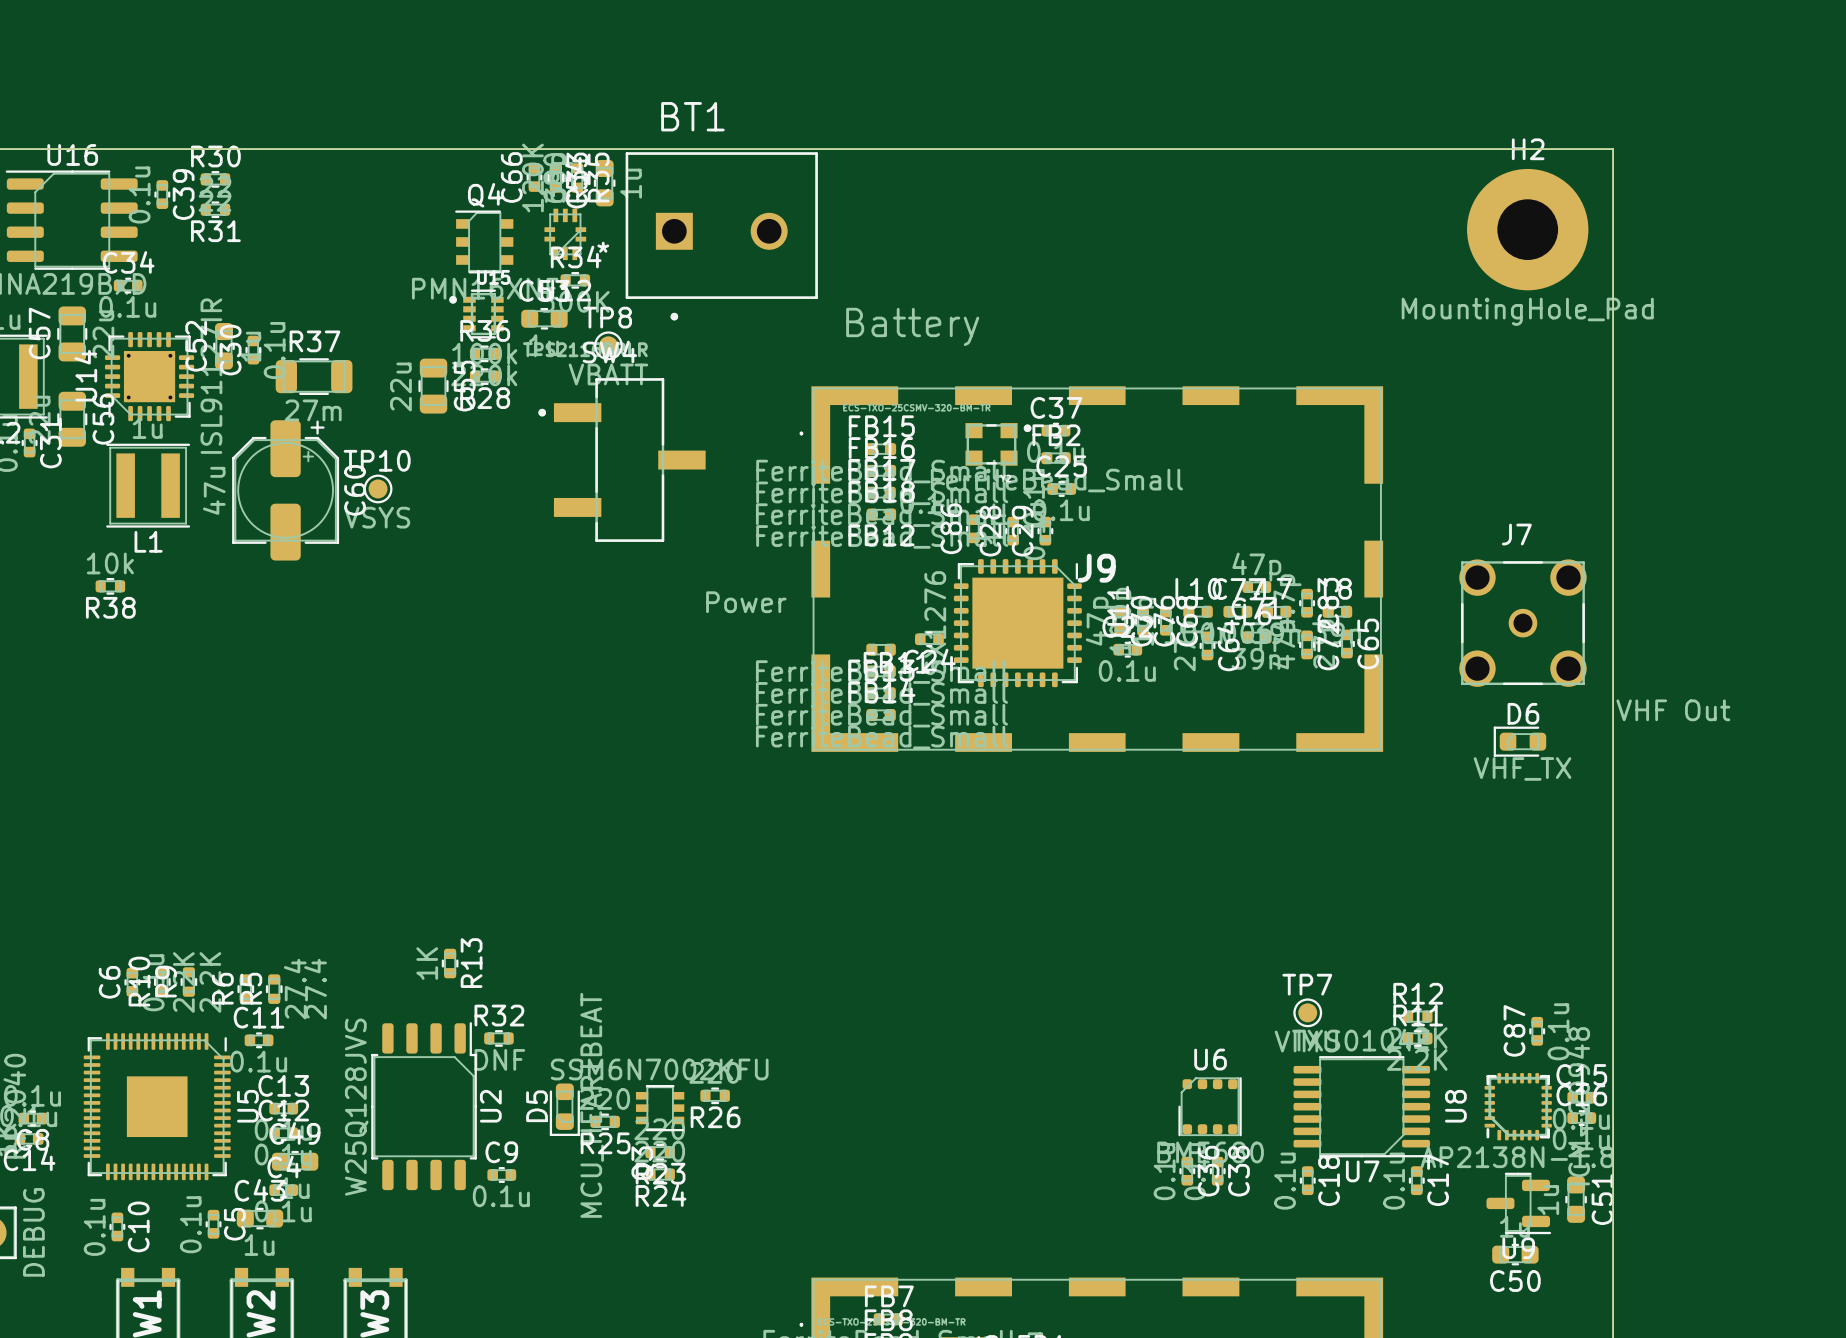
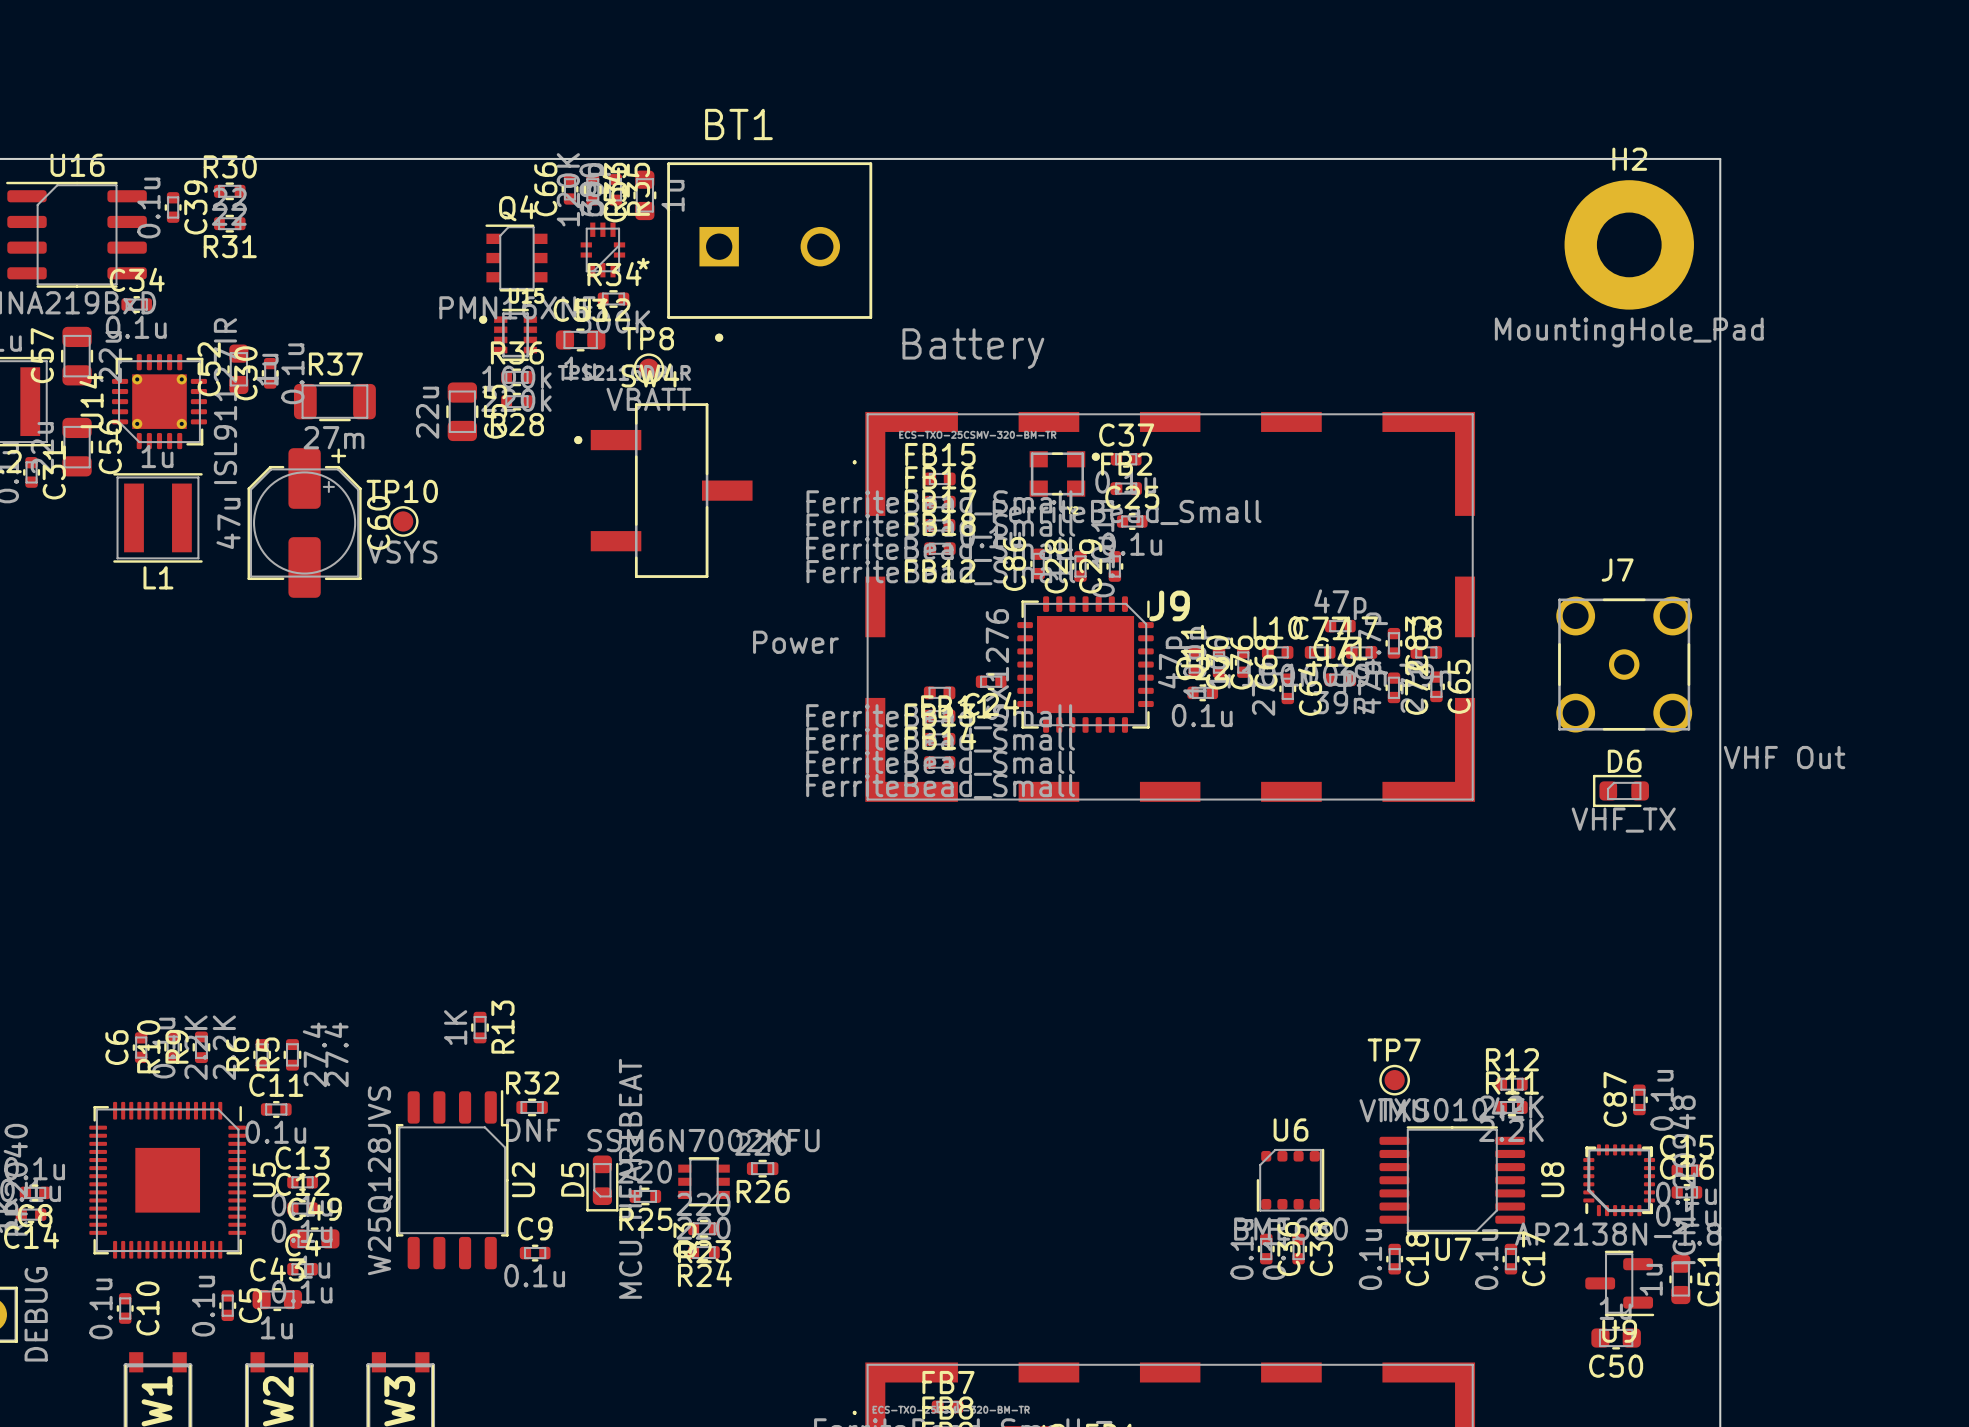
R38: 10k (110, 586) -> none

